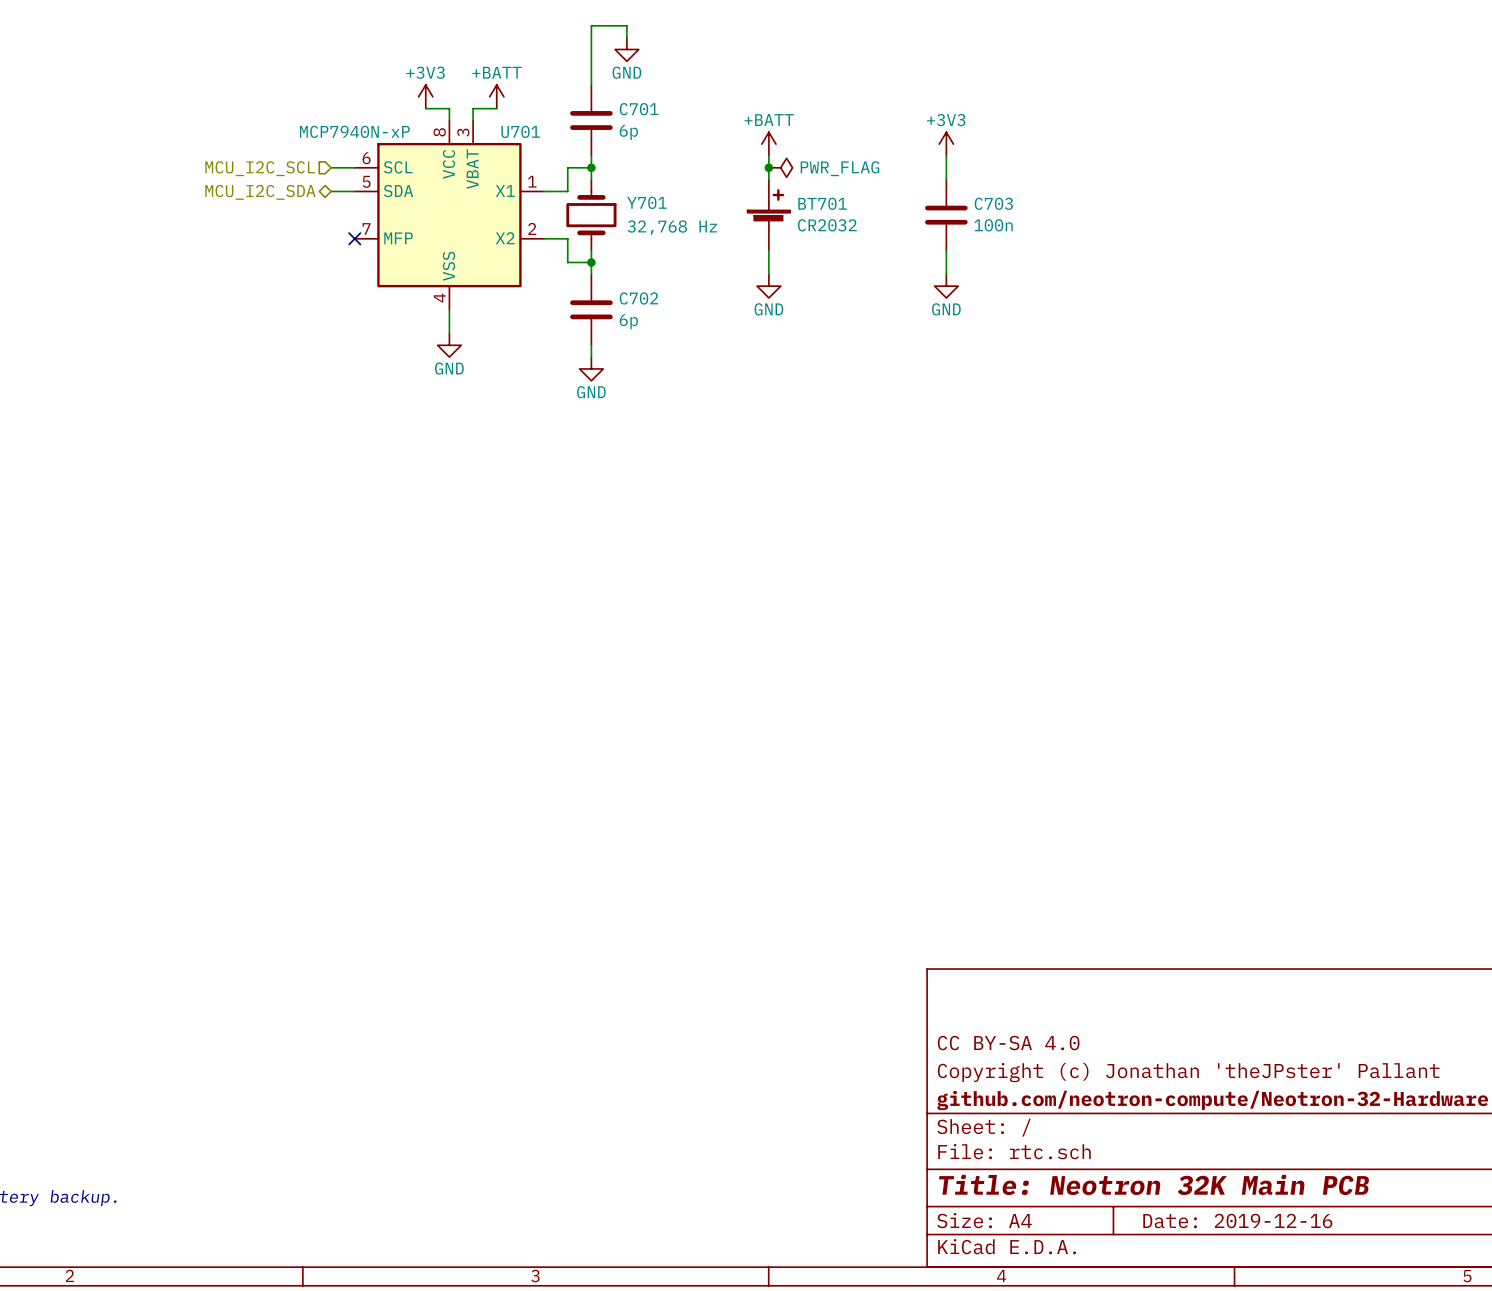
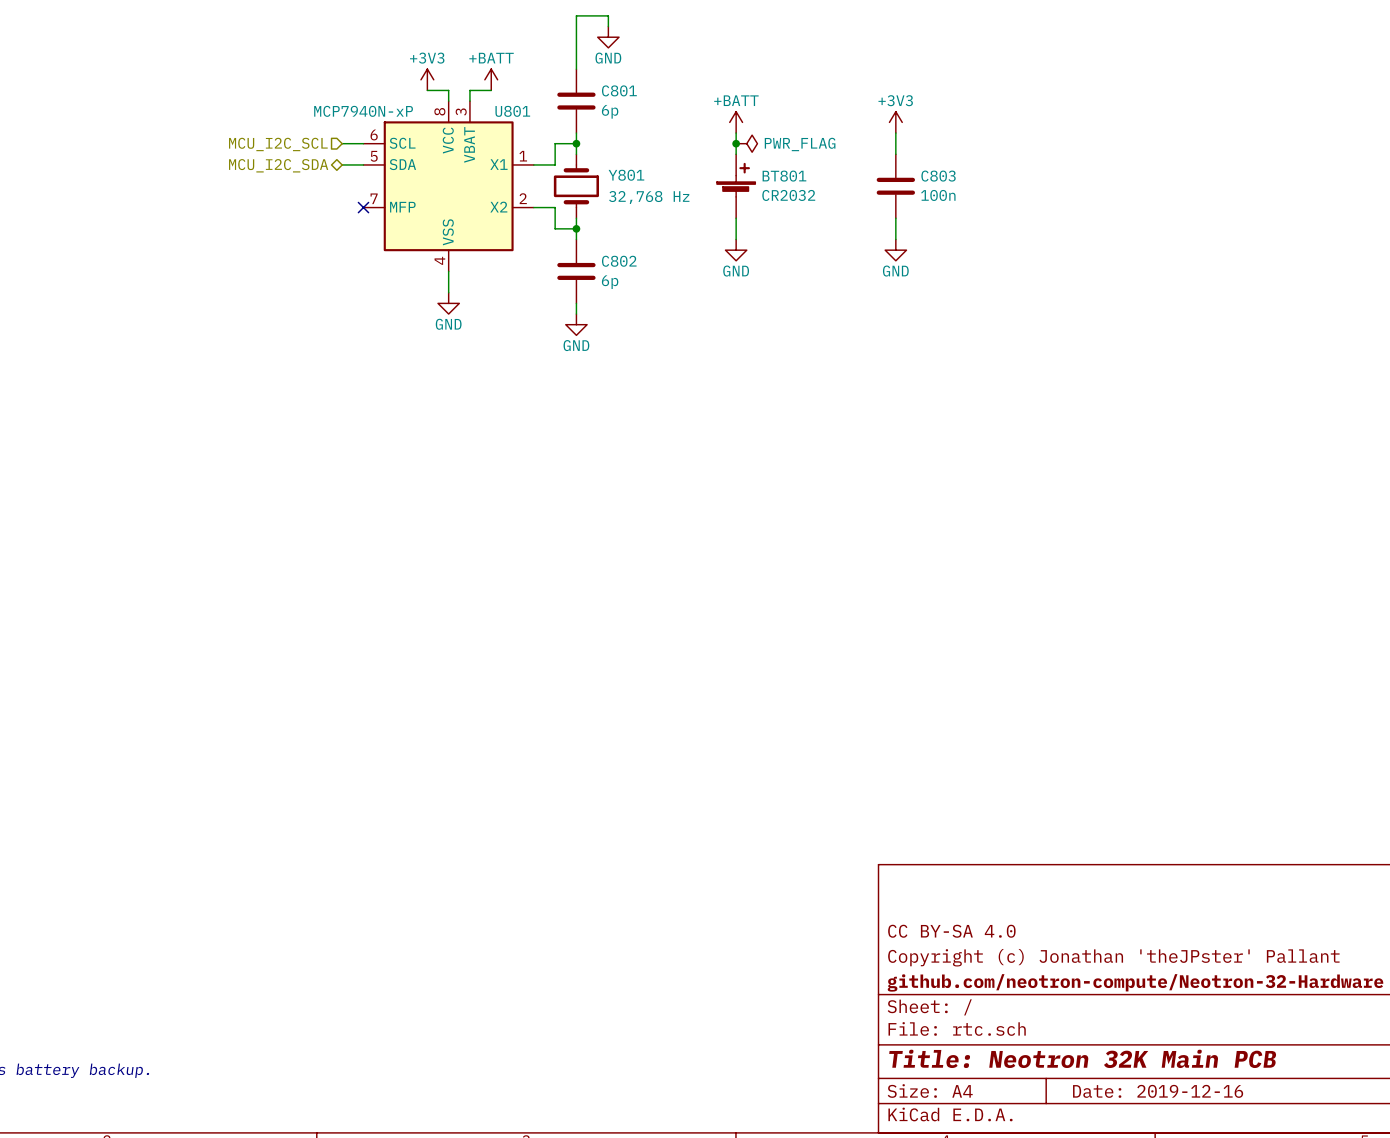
C701 name: C701 (639, 109) -> C801 (619, 90)
U701 name: U701 (520, 131) -> U801 (512, 111)
Y701 name: Y701 (646, 202) -> Y801 (626, 175)
BT701 name: BT701 (822, 203) -> BT801 (784, 176)
C703 name: C703 (993, 203) -> C803 (938, 176)
C702 name: C702 (639, 298) -> C802 (619, 261)

